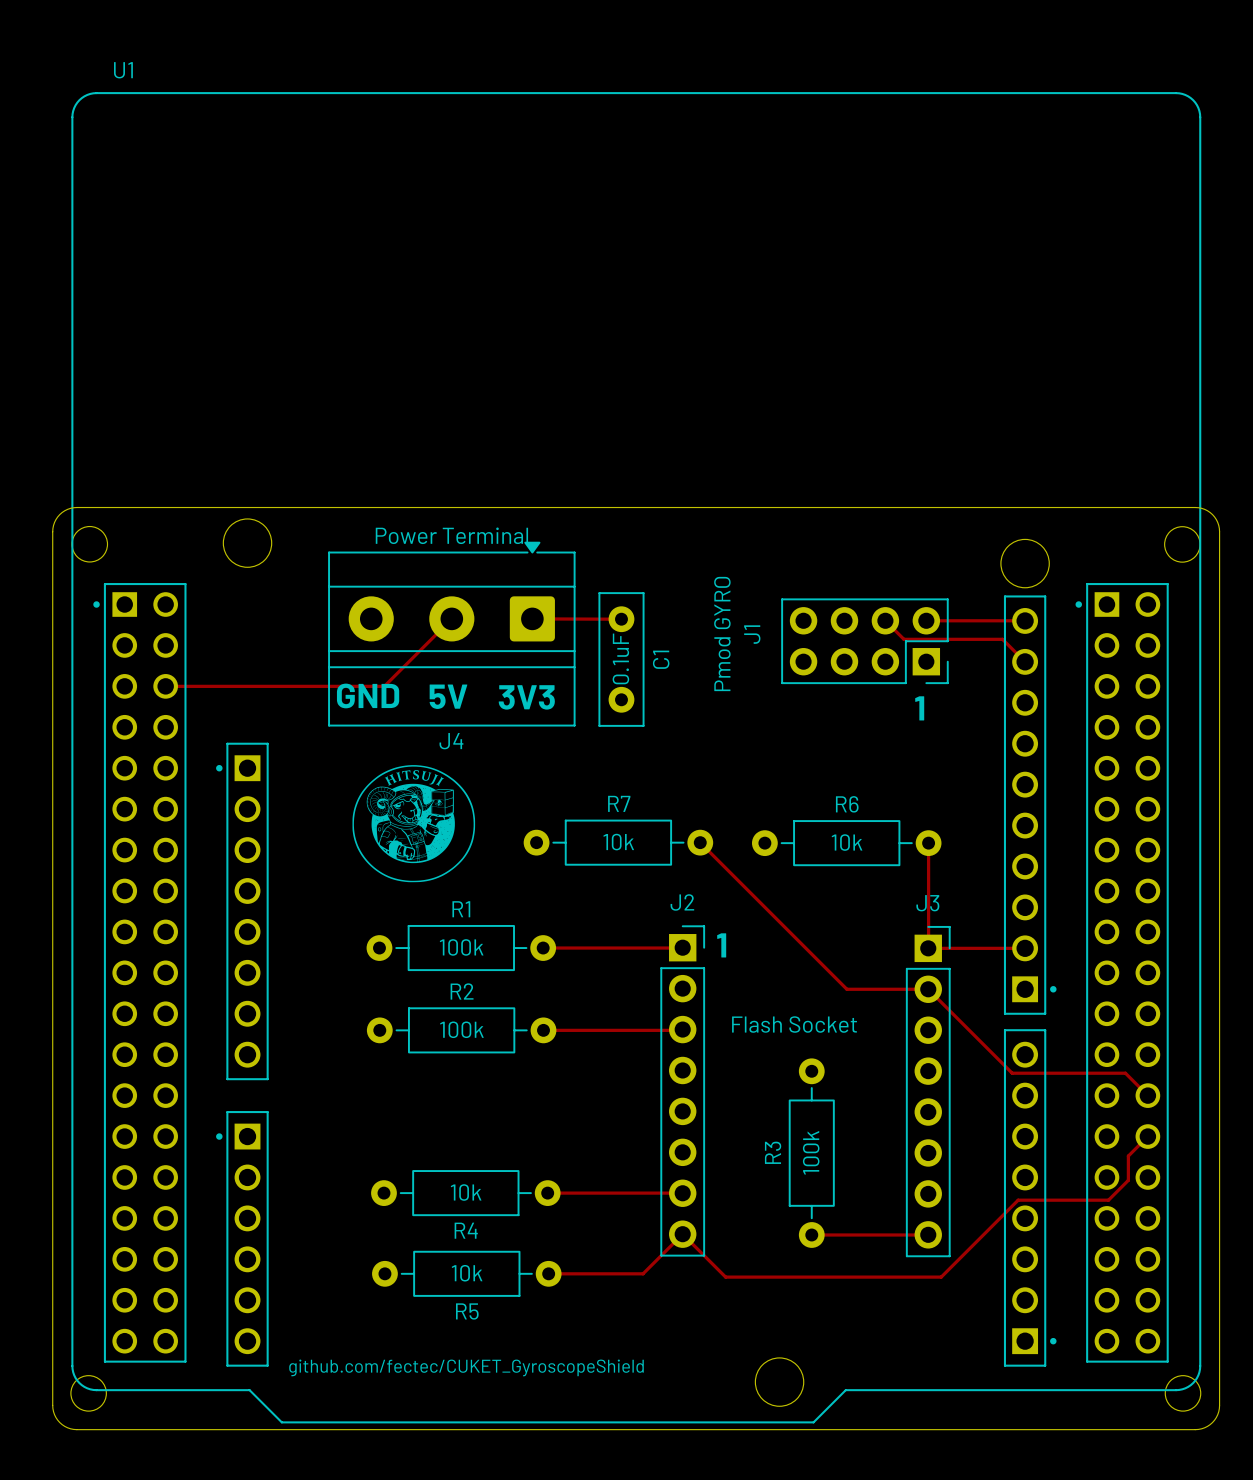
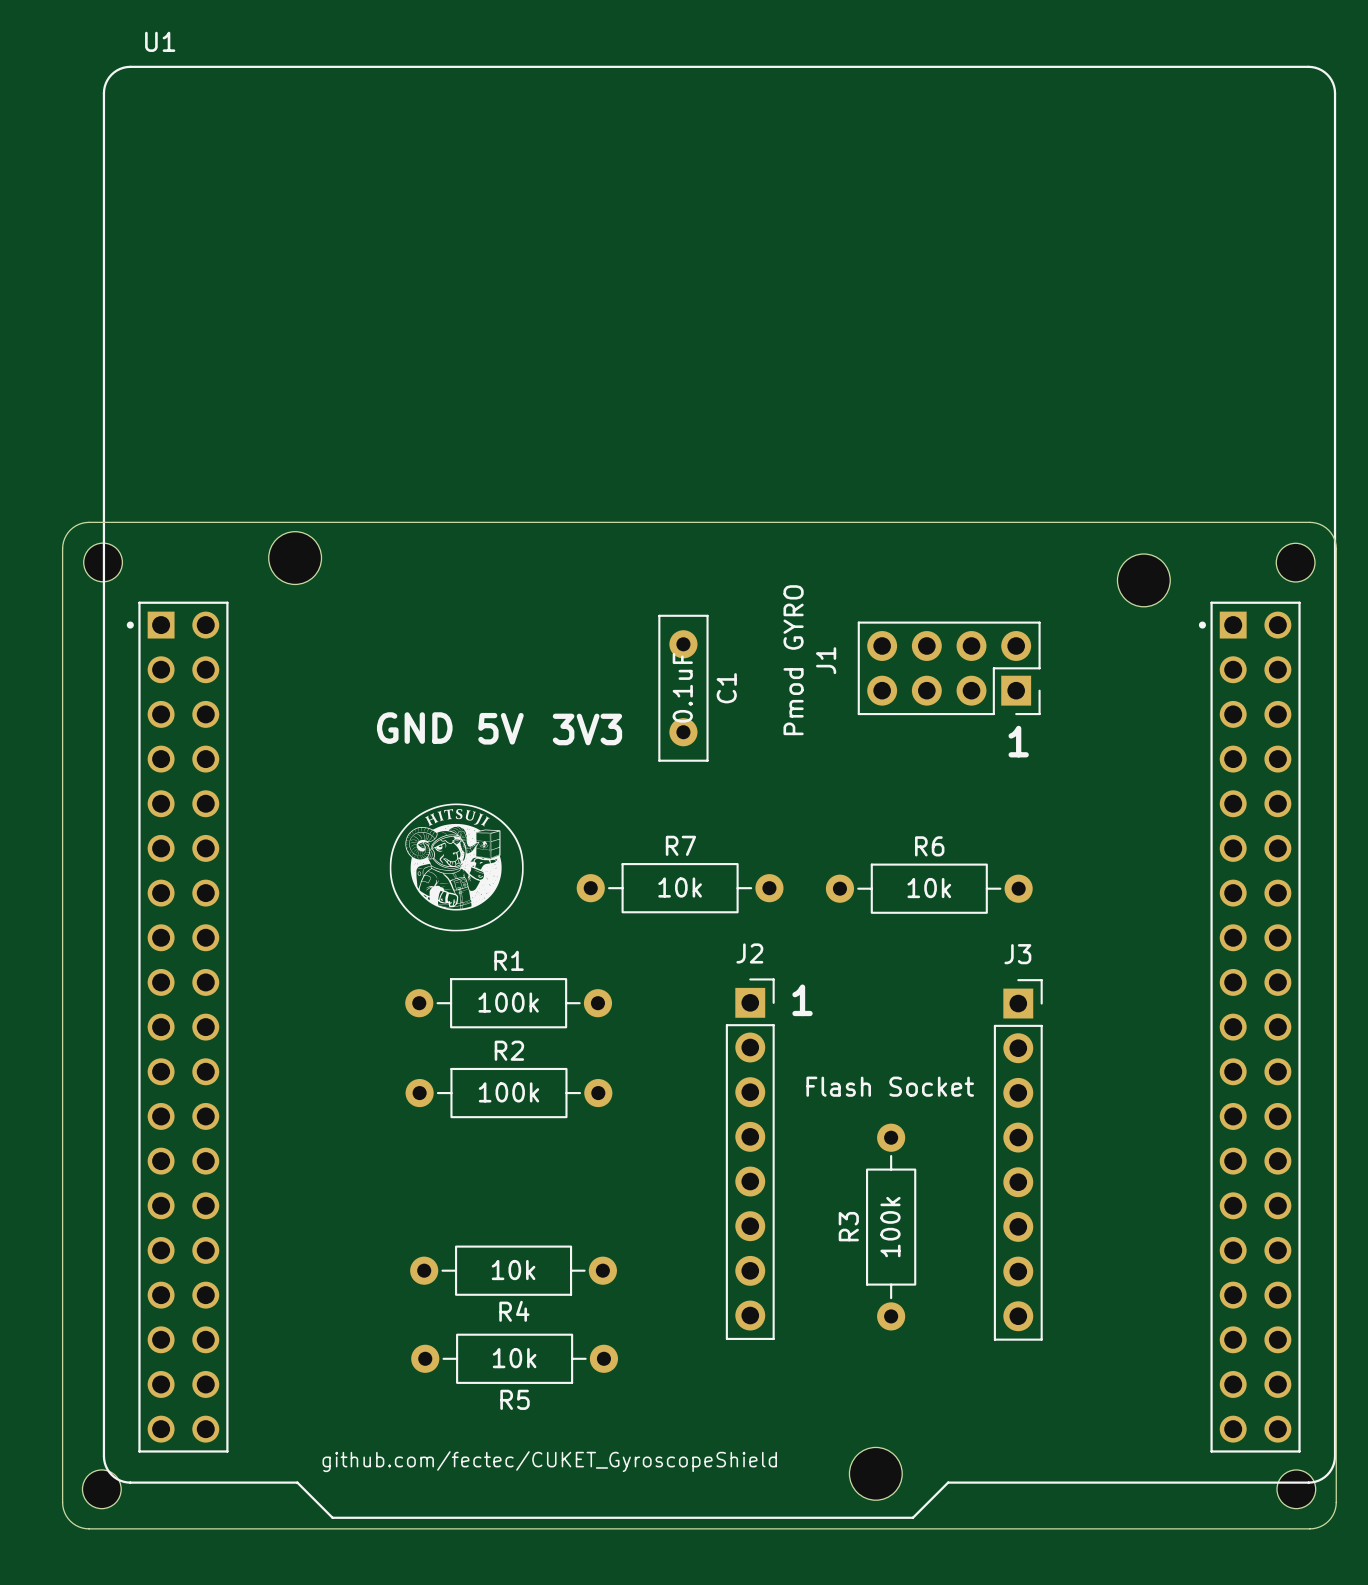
U1 footprint: [71, 92, 1202, 1424] -> [102, 65, 1337, 1519]
track: (451, 618) (384, 686) (165, 686) -> none
track: (532, 618) (621, 619) -> none
track: (885, 620) (903, 639) (1002, 639) (1025, 661) -> none
track: (926, 620) (1024, 620) -> none
J4: Power Terminal (451, 634) -> none
track: (700, 842) (846, 989) (928, 989) (1012, 1073) (1125, 1073) (1147, 1095) -> none
track: (928, 843) (928, 948) (1025, 948) -> none
track: (682, 947) (543, 948) -> none
track: (682, 1029) (543, 1030) -> none
track: (1147, 1136) (1128, 1156) (1128, 1180) (1108, 1200) (1018, 1200) (941, 1277) (725, 1277) (682, 1234) (643, 1273) (548, 1273) -> none
track: (547, 1193) (682, 1193) -> none
track: (811, 1234) (928, 1234) -> none

